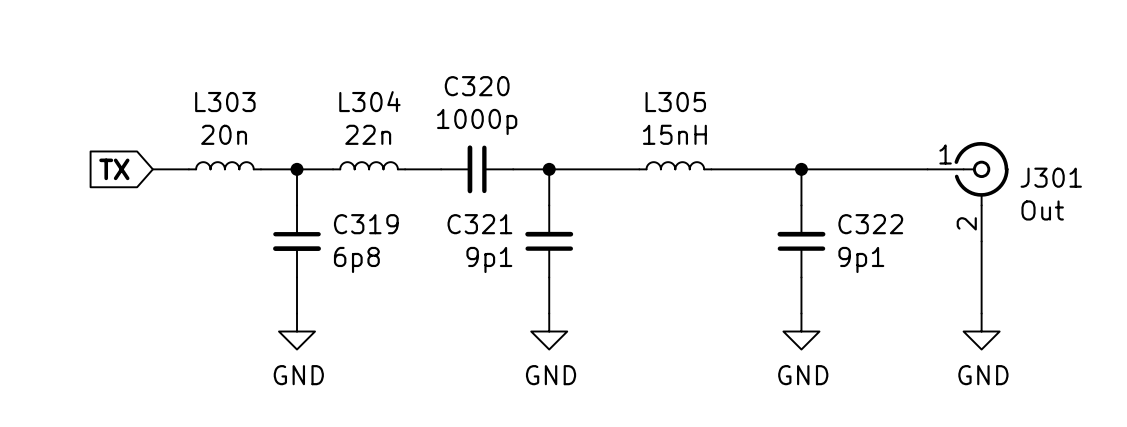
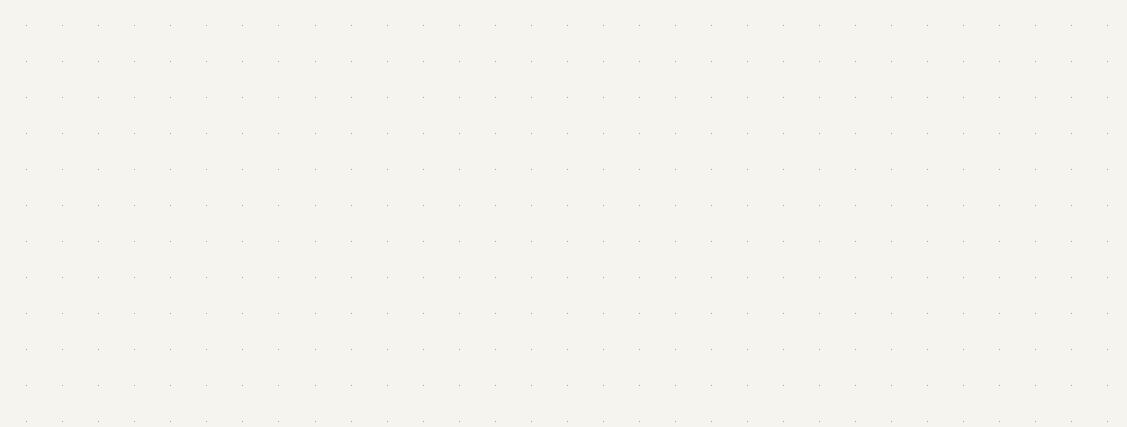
L303: 20n (224, 165) -> none
L304: 22n (369, 165) -> none
L305: 15nH (675, 165) -> none
global label: TX (114, 169) -> none
wire: (152, 169) (188, 169) -> none
wire: (260, 169) (333, 169) -> none
wire: (297, 169) (297, 205) -> none
junction: (297, 169) -> none
wire: (405, 169) (441, 169) -> none
C320: 1000p (477, 169) -> none
wire: (513, 169) (639, 169) -> none
wire: (549, 169) (549, 205) -> none
junction: (549, 169) -> none
wire: (711, 169) (927, 169) -> none
wire: (801, 169) (801, 205) -> none
junction: (801, 169) -> none
J301: Out (968, 191) -> none
C319: 6p8 (297, 241) -> none
C321: 9p1 (549, 241) -> none
C322: 9p1 (801, 241) -> none
wire: (981, 241) (981, 313) -> none
wire: (297, 277) (297, 313) -> none
wire: (549, 277) (549, 313) -> none
wire: (801, 277) (801, 313) -> none
power symbol: GND (297, 331) -> none
power symbol: GND (549, 331) -> none
power symbol: GND (801, 331) -> none
power symbol: GND (981, 331) -> none

